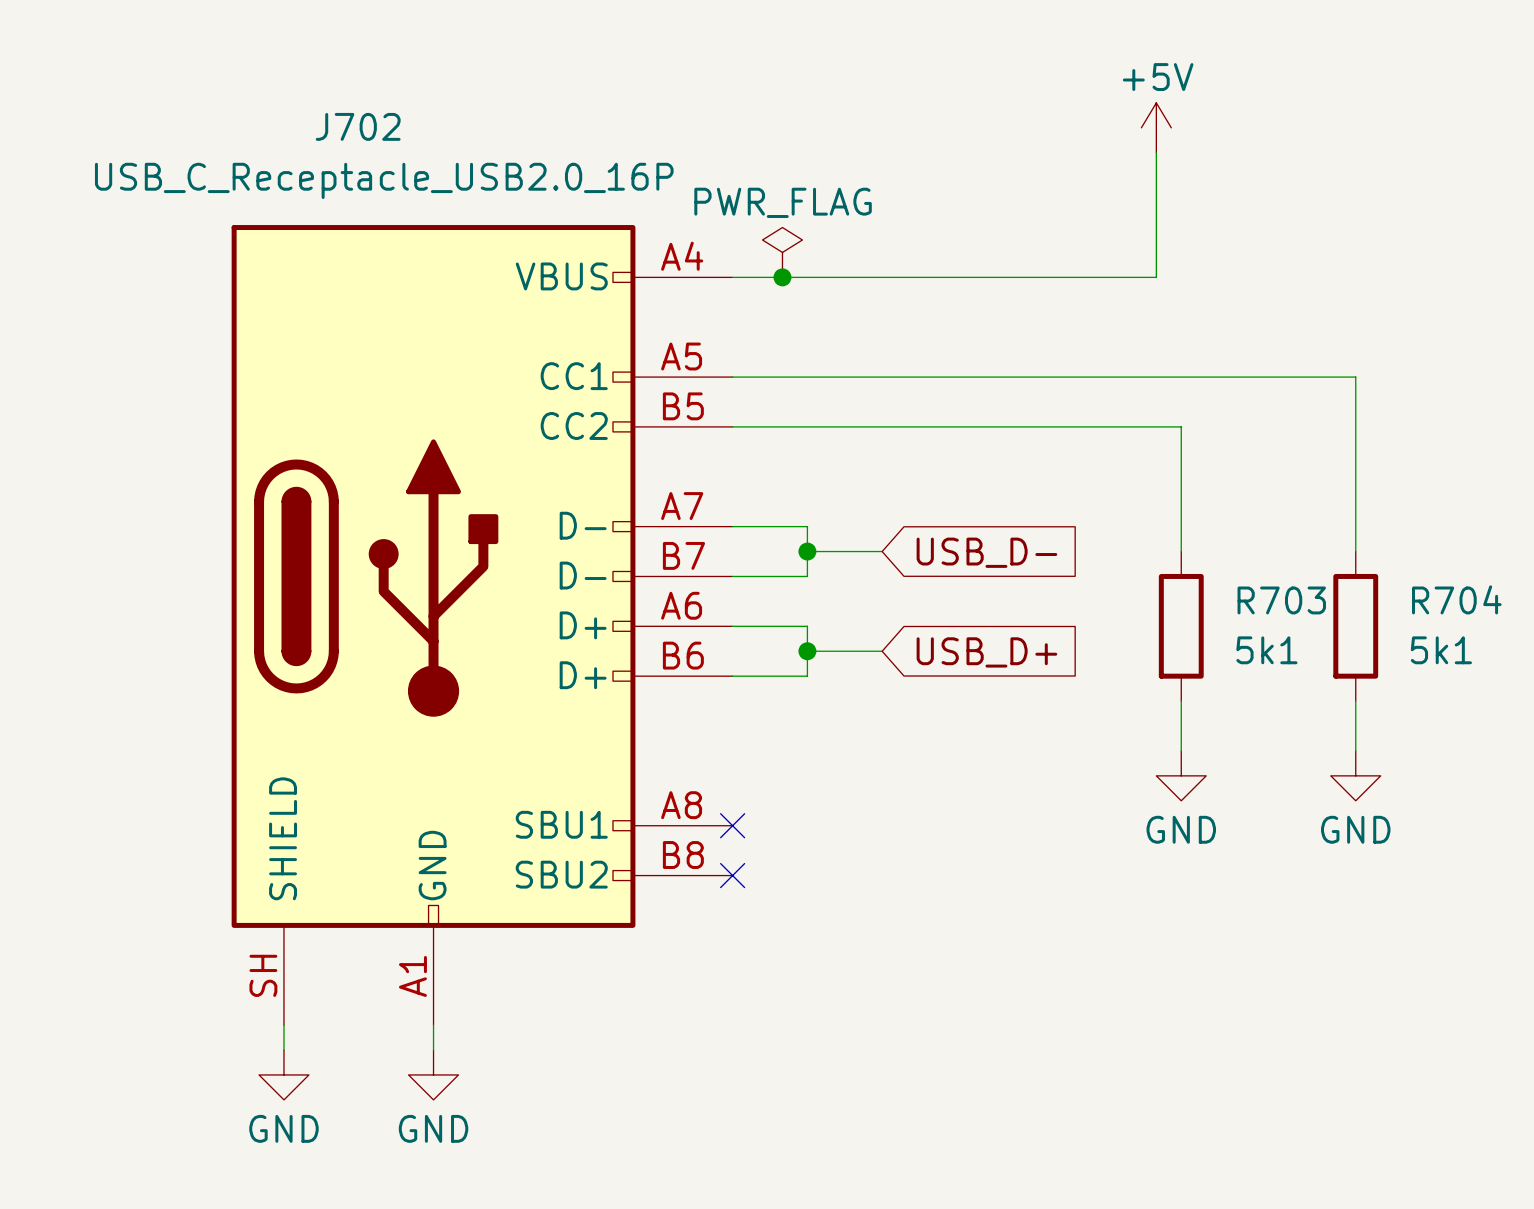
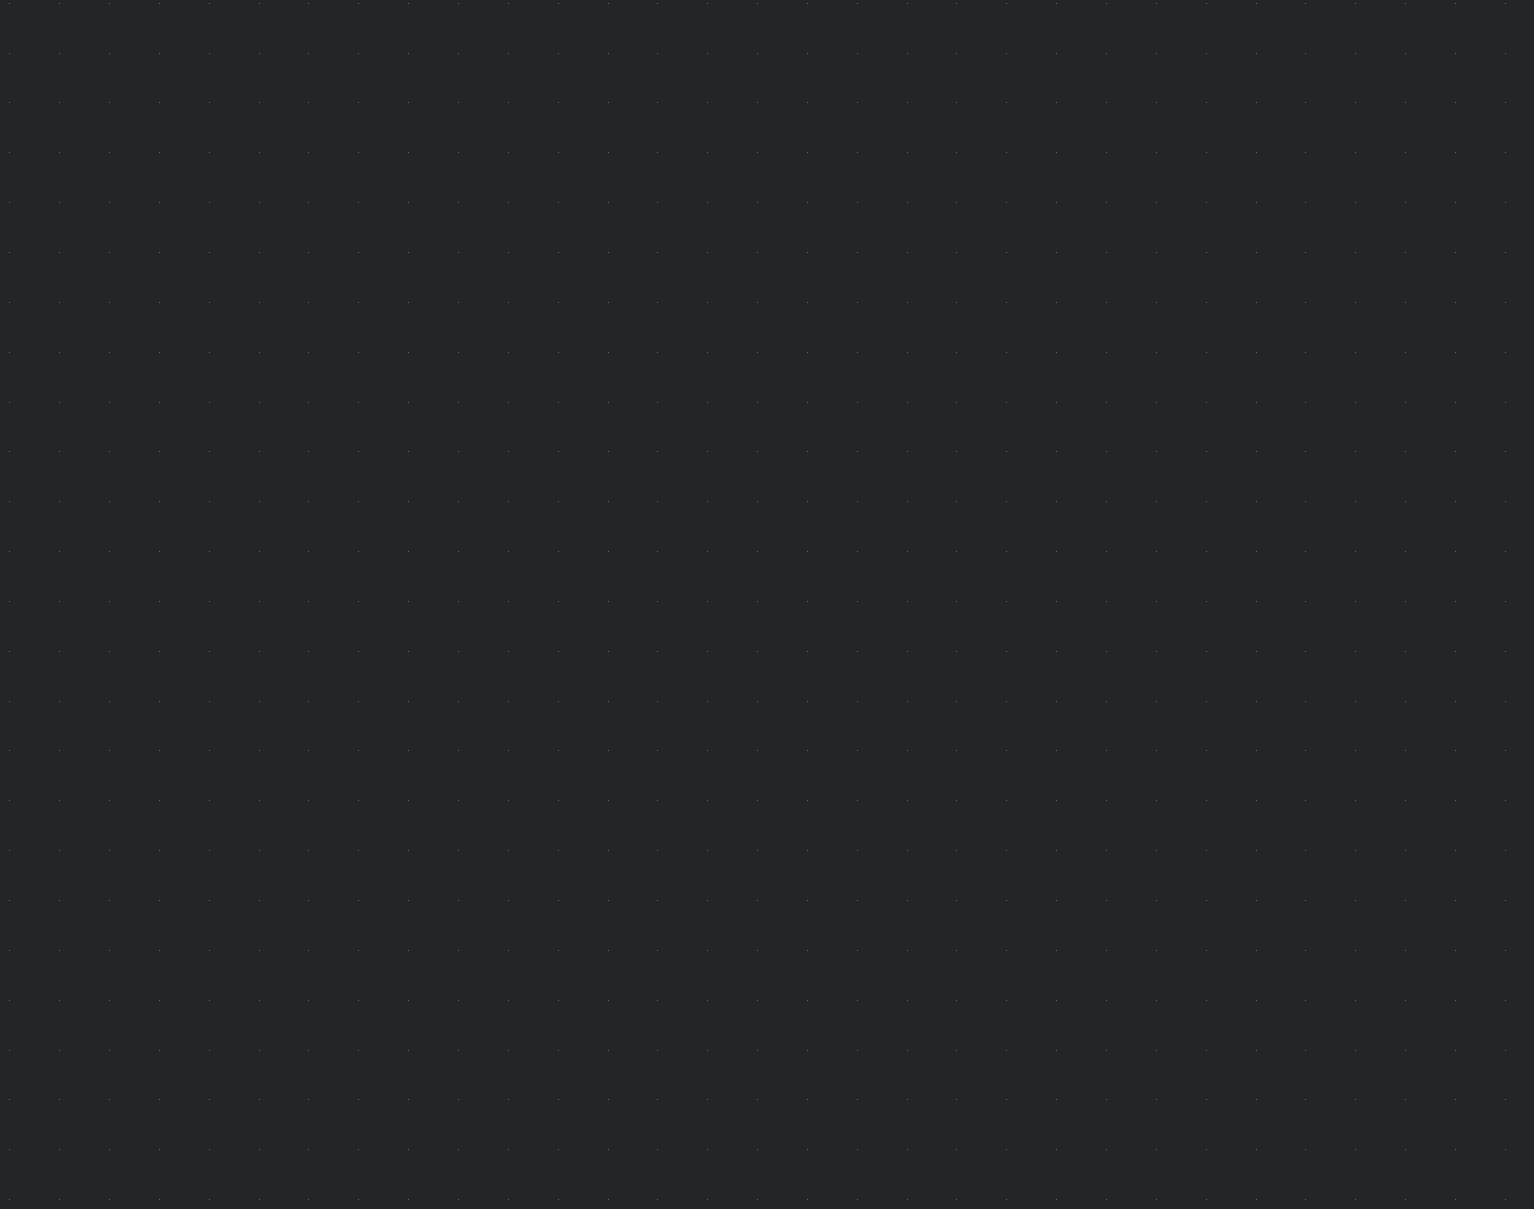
power symbol: +5V (1156, 127) -> none
wire: (1156, 152) (1156, 277) (732, 277) -> none
power symbol: PWR_FLAG (782, 252) -> none
junction: (782, 277) -> none
wire: (732, 377) (1355, 377) (1355, 551) -> none
wire: (732, 426) (1181, 426) (1181, 551) -> none
wire: (732, 526) (807, 526) (807, 576) (732, 576) -> none
wire: (807, 551) (882, 551) -> none
junction: (807, 551) -> none
global label: USB_D- (986, 552) -> none
J702: USB_C_Receptacle_USB2.0_16P (482, 625) -> none
wire: (732, 626) (807, 626) (807, 676) (732, 676) -> none
R703: 5k1 (1181, 626) -> none
R704: 5k1 (1355, 626) -> none
wire: (807, 651) (882, 651) -> none
junction: (807, 651) -> none
global label: USB_D+ (986, 652) -> none
wire: (1181, 701) (1181, 750) -> none
wire: (1355, 701) (1355, 750) -> none
power symbol: GND (1181, 775) -> none
power symbol: GND (1355, 775) -> none
no-connect mark: (732, 825) -> none
no-connect mark: (732, 875) -> none
wire: (283, 1025) (283, 1050) -> none
wire: (433, 1025) (433, 1050) -> none
power symbol: GND (283, 1074) -> none
power symbol: GND (433, 1074) -> none

